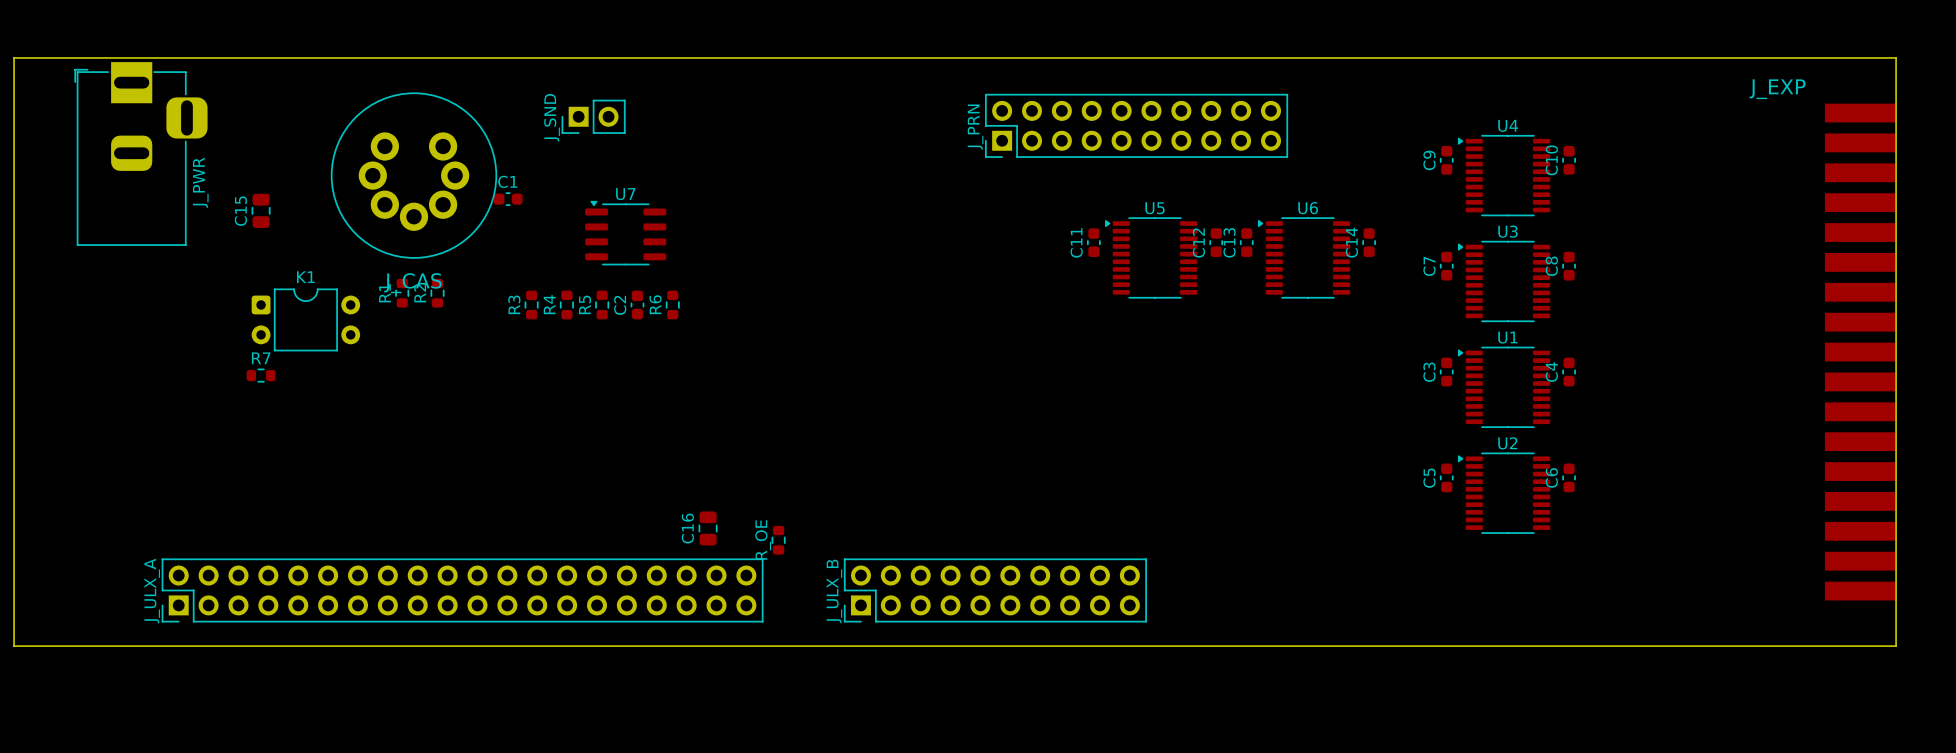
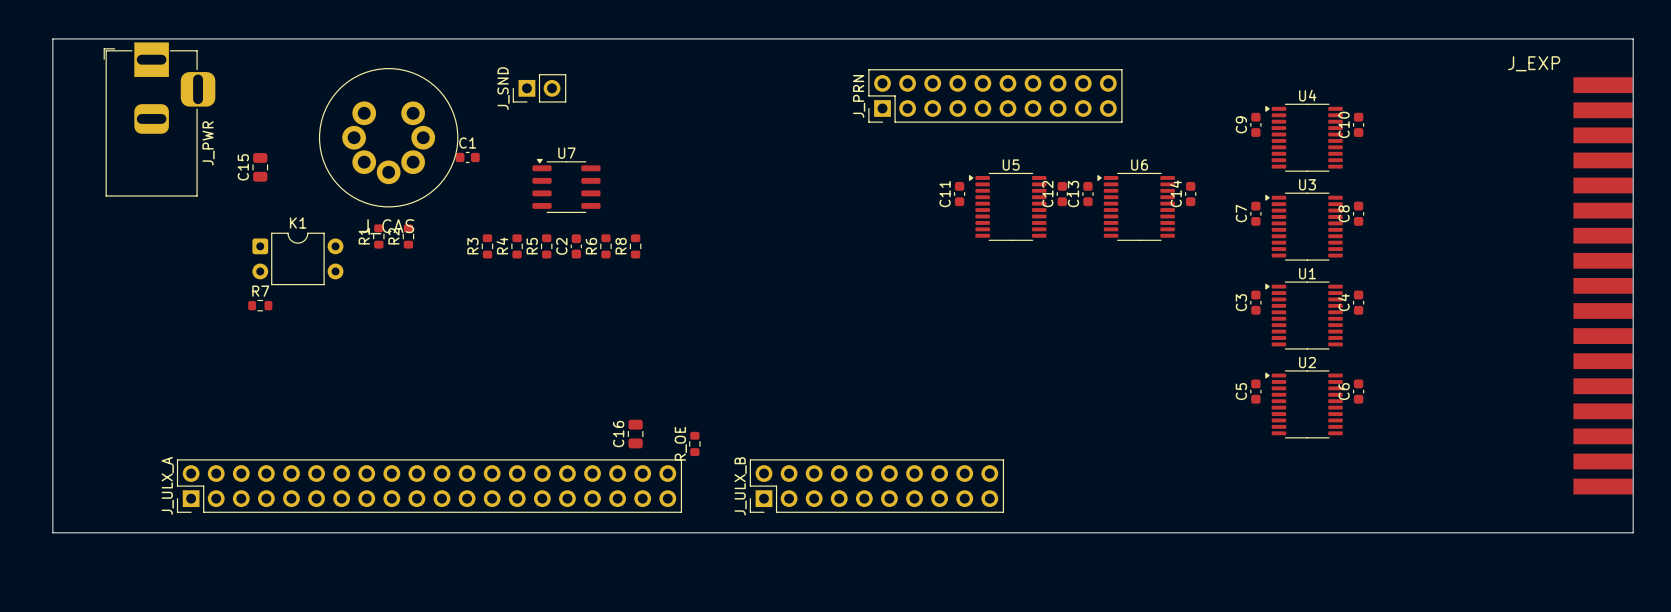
R8: none -> (635, 246)

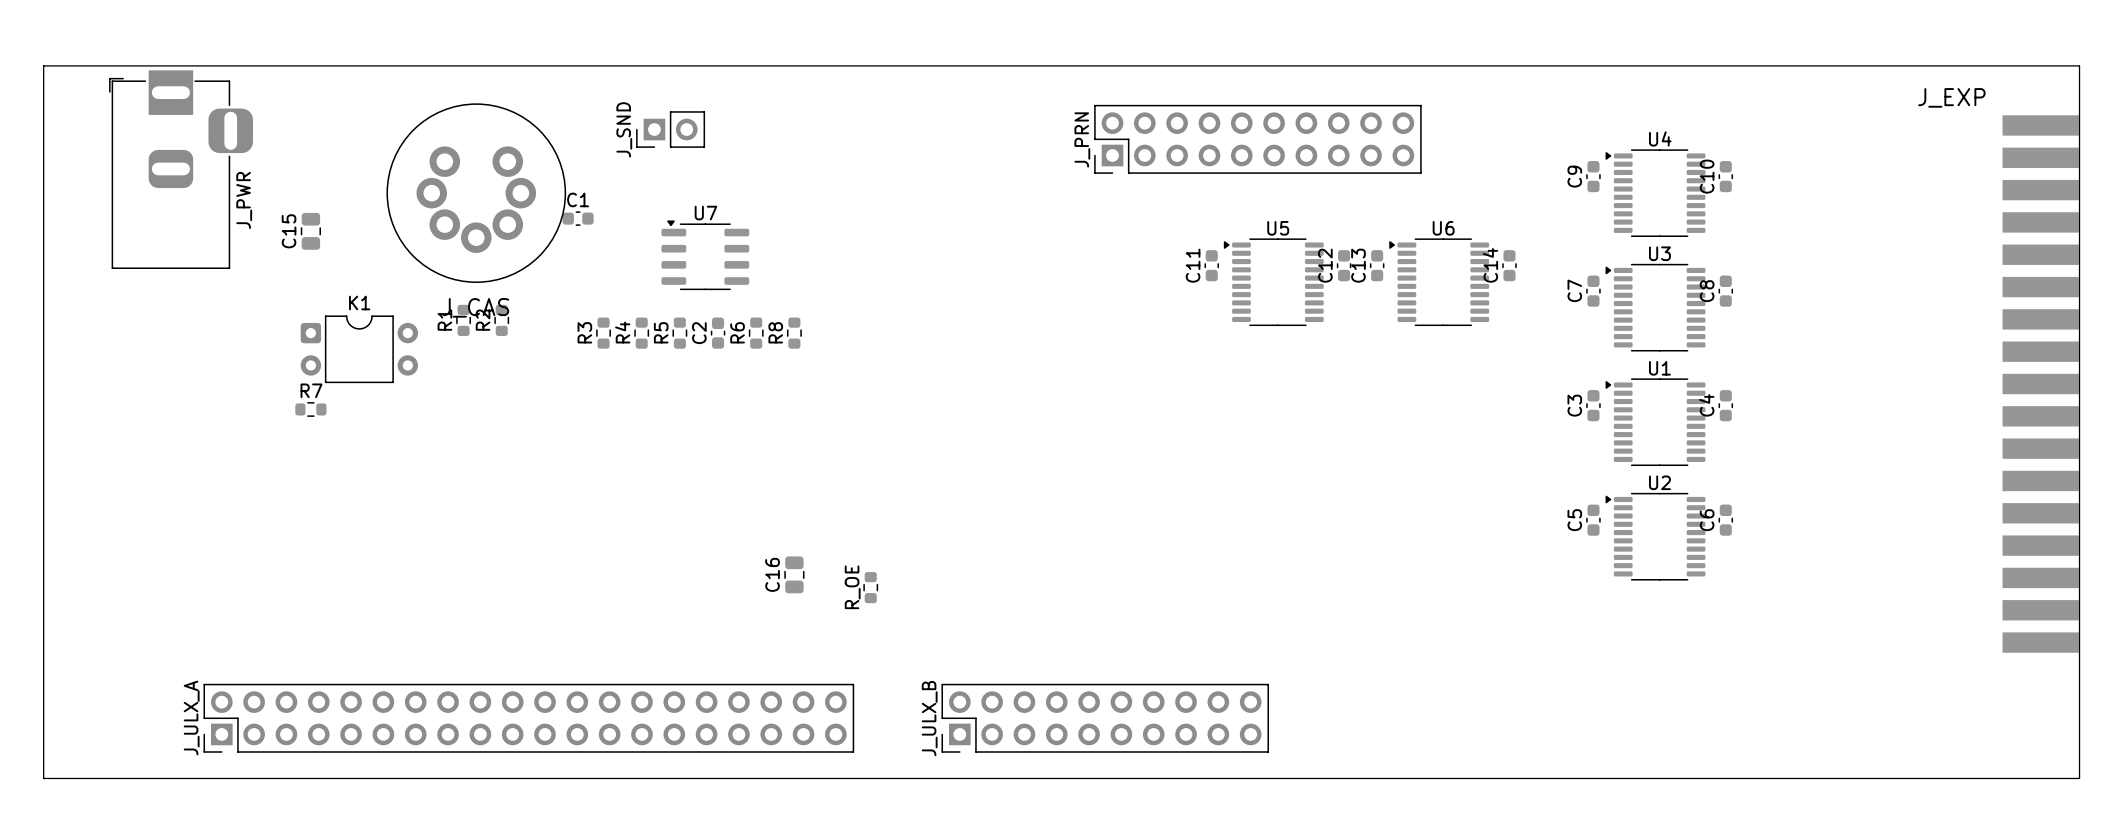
J_ULX_A position: (429, 486) -> (528, 718)
J_ULX_B position: (876, 486) -> (1105, 718)
board edge: (52, 532) (1633, 532) -> (43, 702) (43, 778) (2079, 778) (2079, 702)

